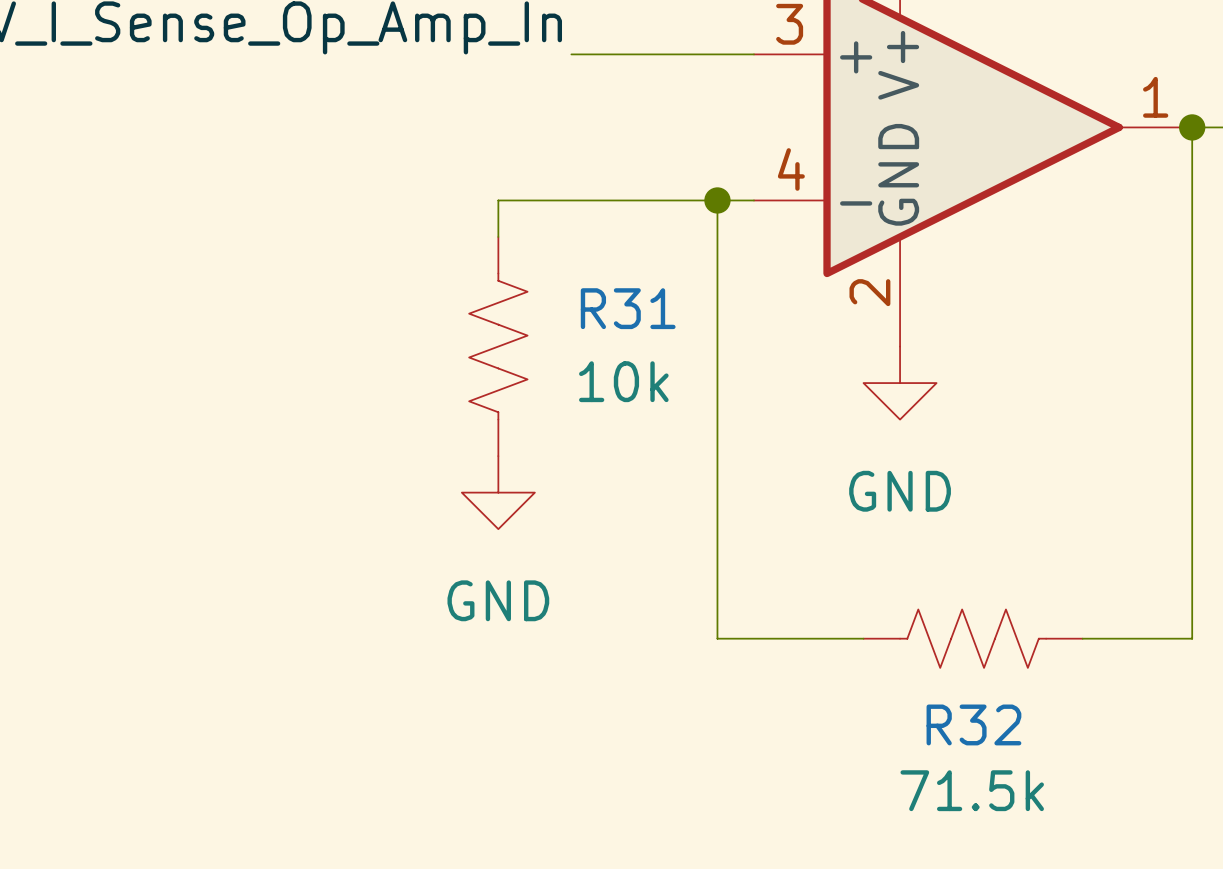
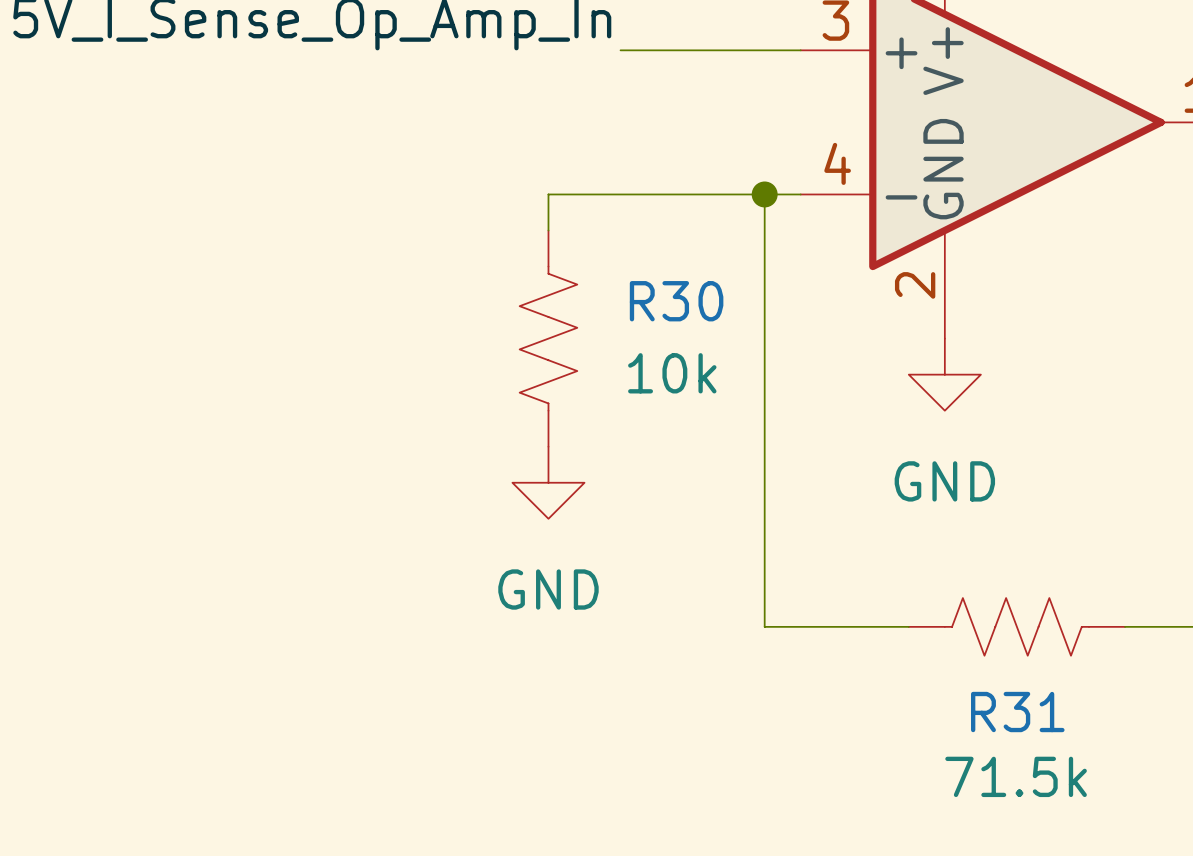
R31 name: R31 (628, 308) -> R30 (676, 301)
R32 name: R32 (973, 724) -> R31 (1017, 712)

